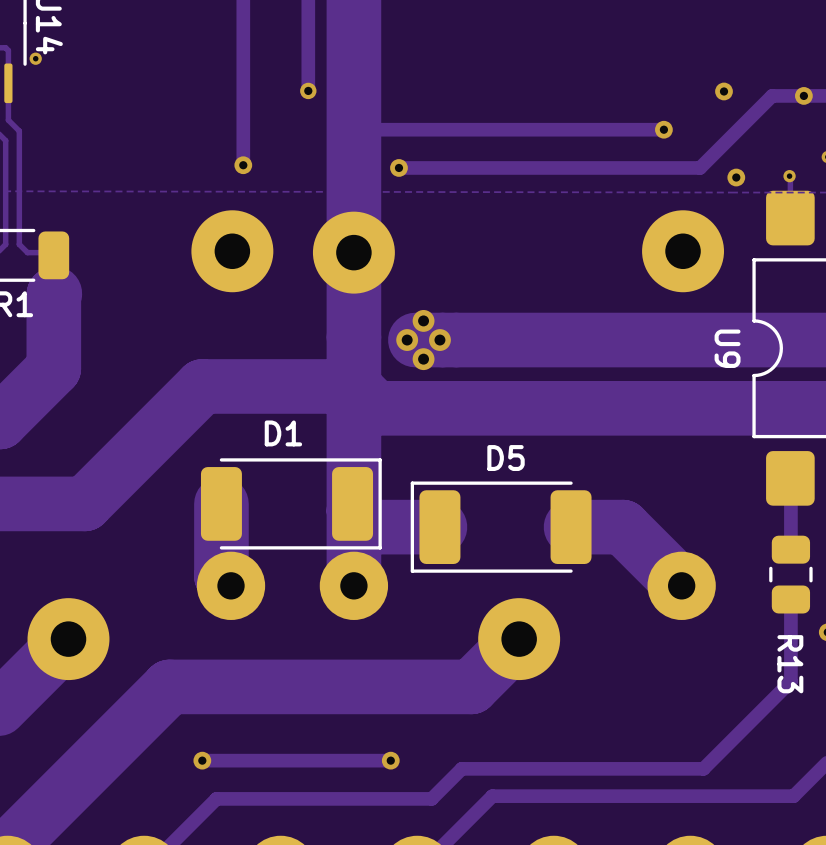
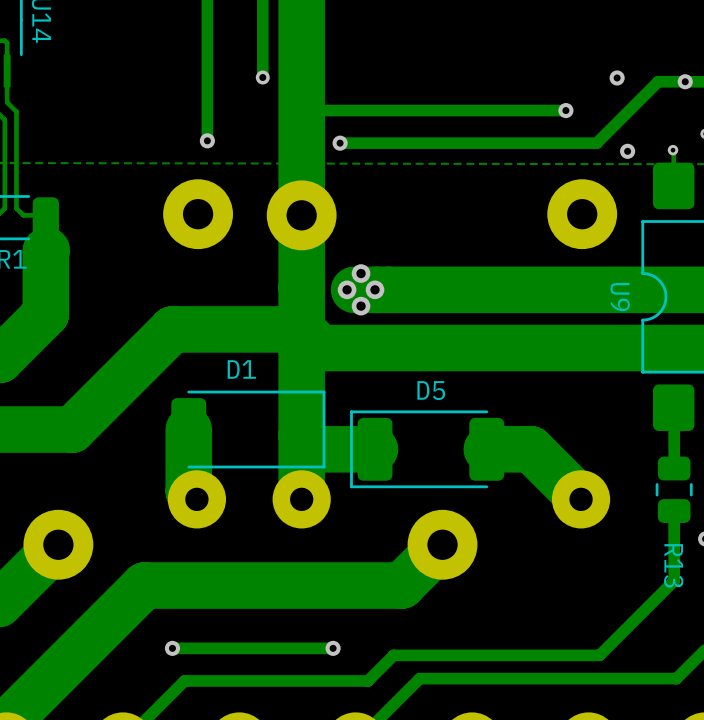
via: (35, 58) -> none

